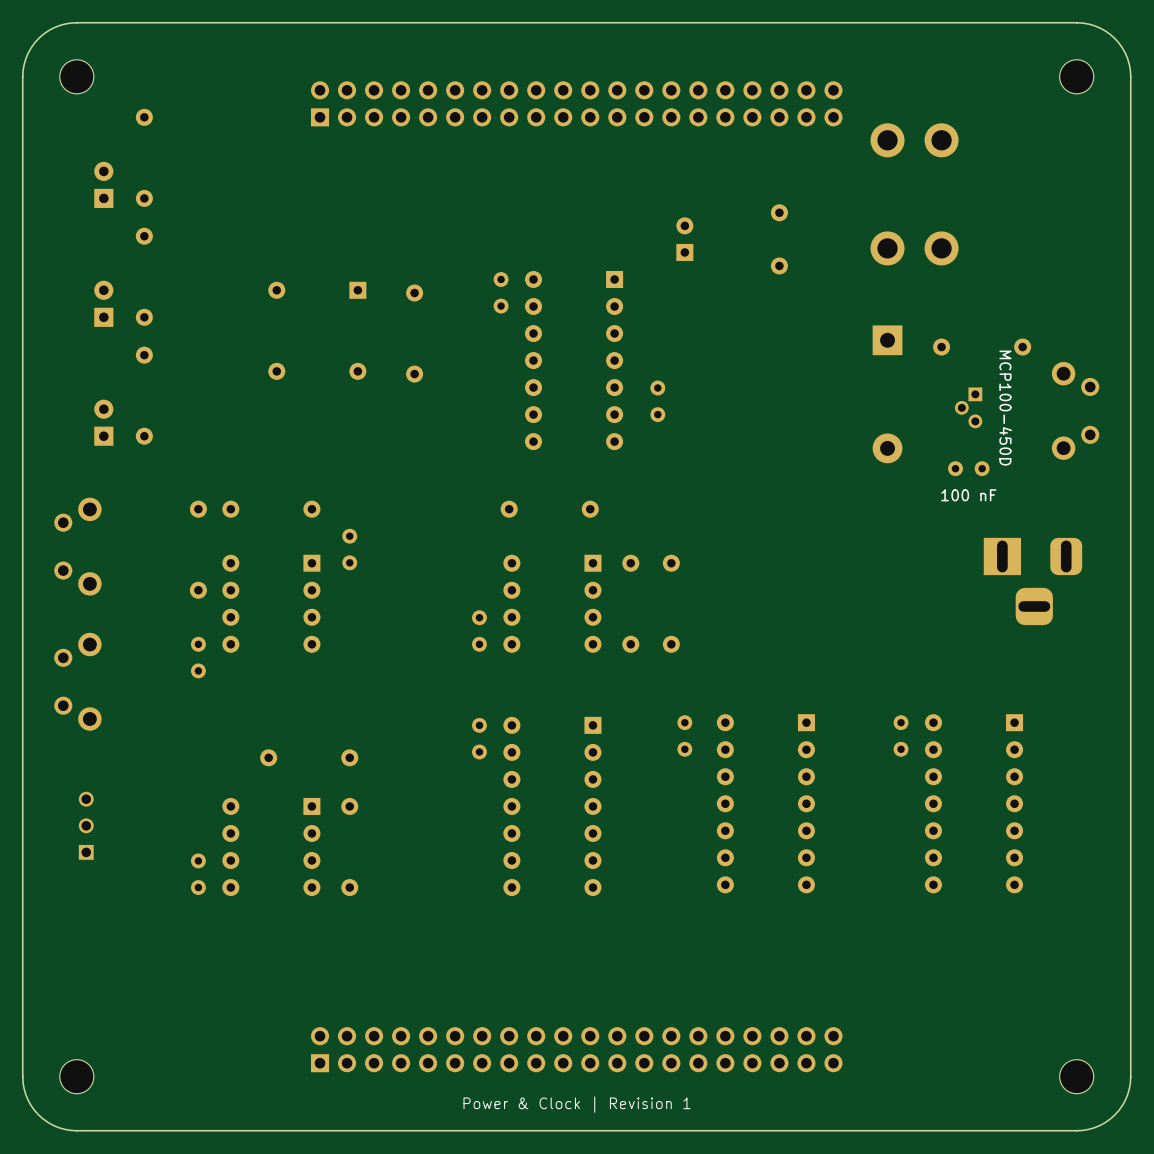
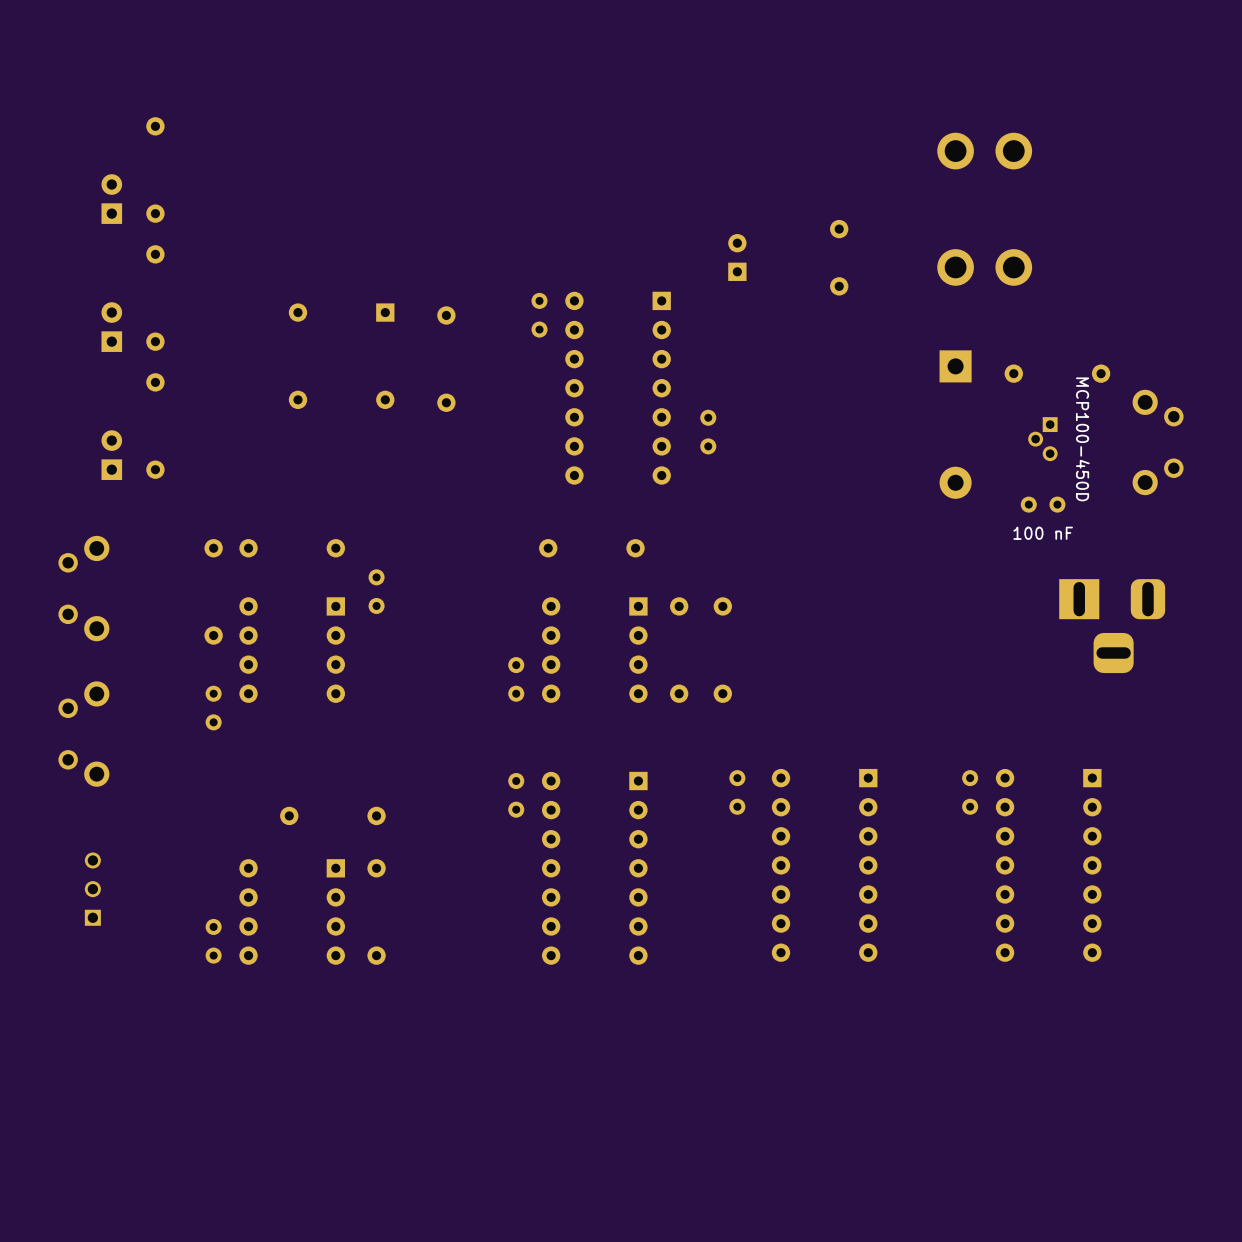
board edge: (1076, 22) (76, 22) (53, 28) (38, 38) (28, 53) (22, 76) (22, 1076) (28, 1100) (38, 1114) (53, 1125) (76, 1130) (1076, 1130) (1094, 1127) (1114, 1114) (1125, 1100) (1130, 1076) (1130, 76) (1127, 58) (1114, 38) (1100, 28) (1076, 22) -> none
part: (76, 76) -> none
part: (1076, 76) -> none
part: (576, 103) -> none
part: (576, 1049) -> none
part: (76, 1076) -> none
part: (1076, 1076) -> none
text: Power & Clock | Revision 1 (577, 1104) -> none

